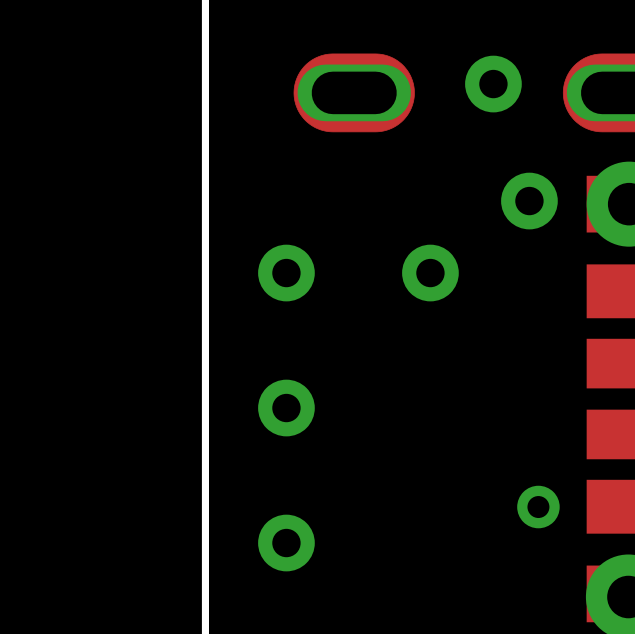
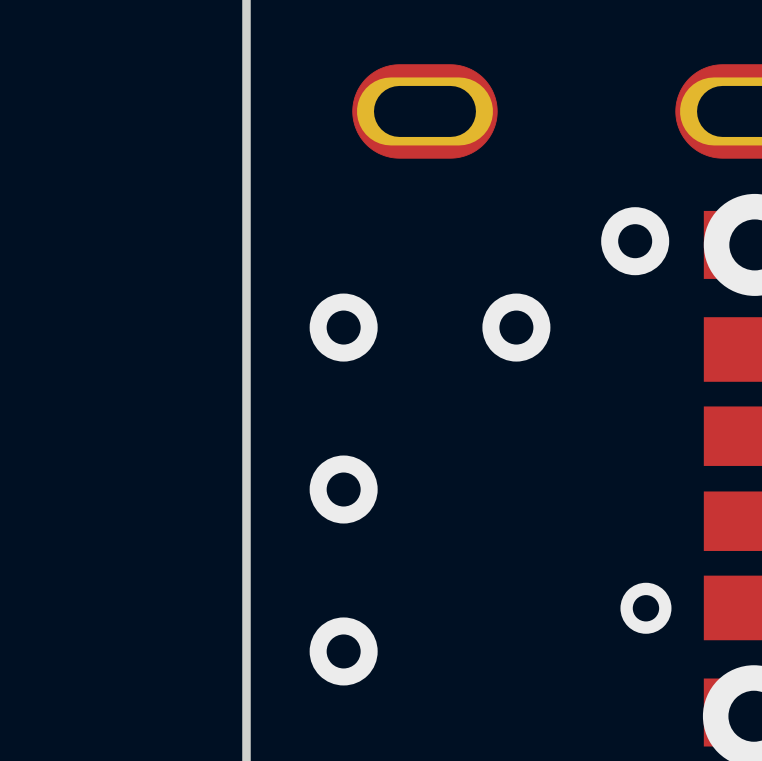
via: (493, 84) -> none

